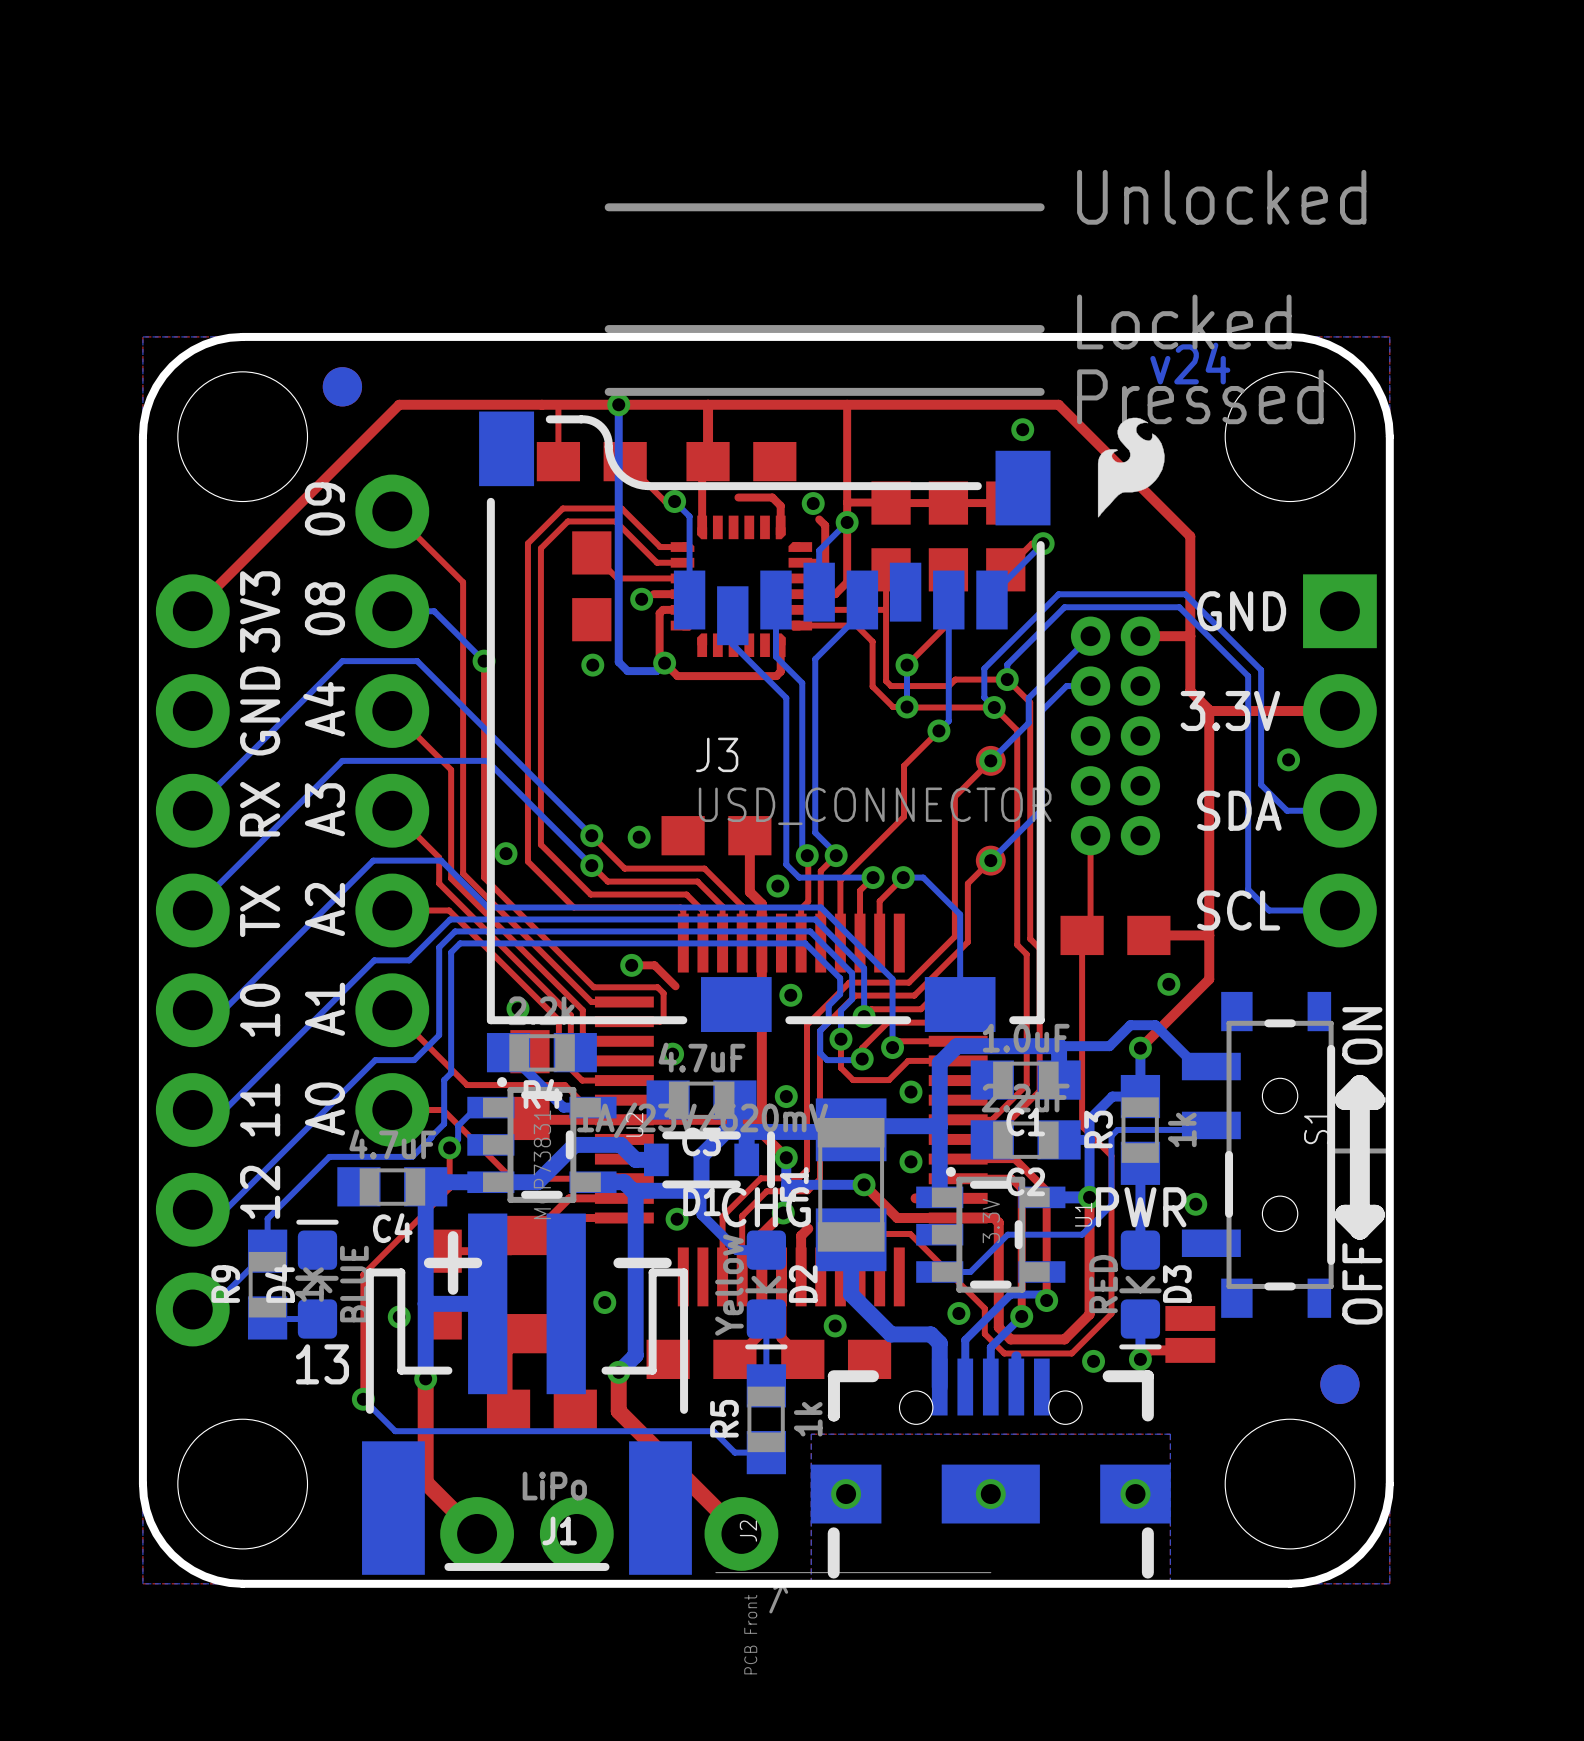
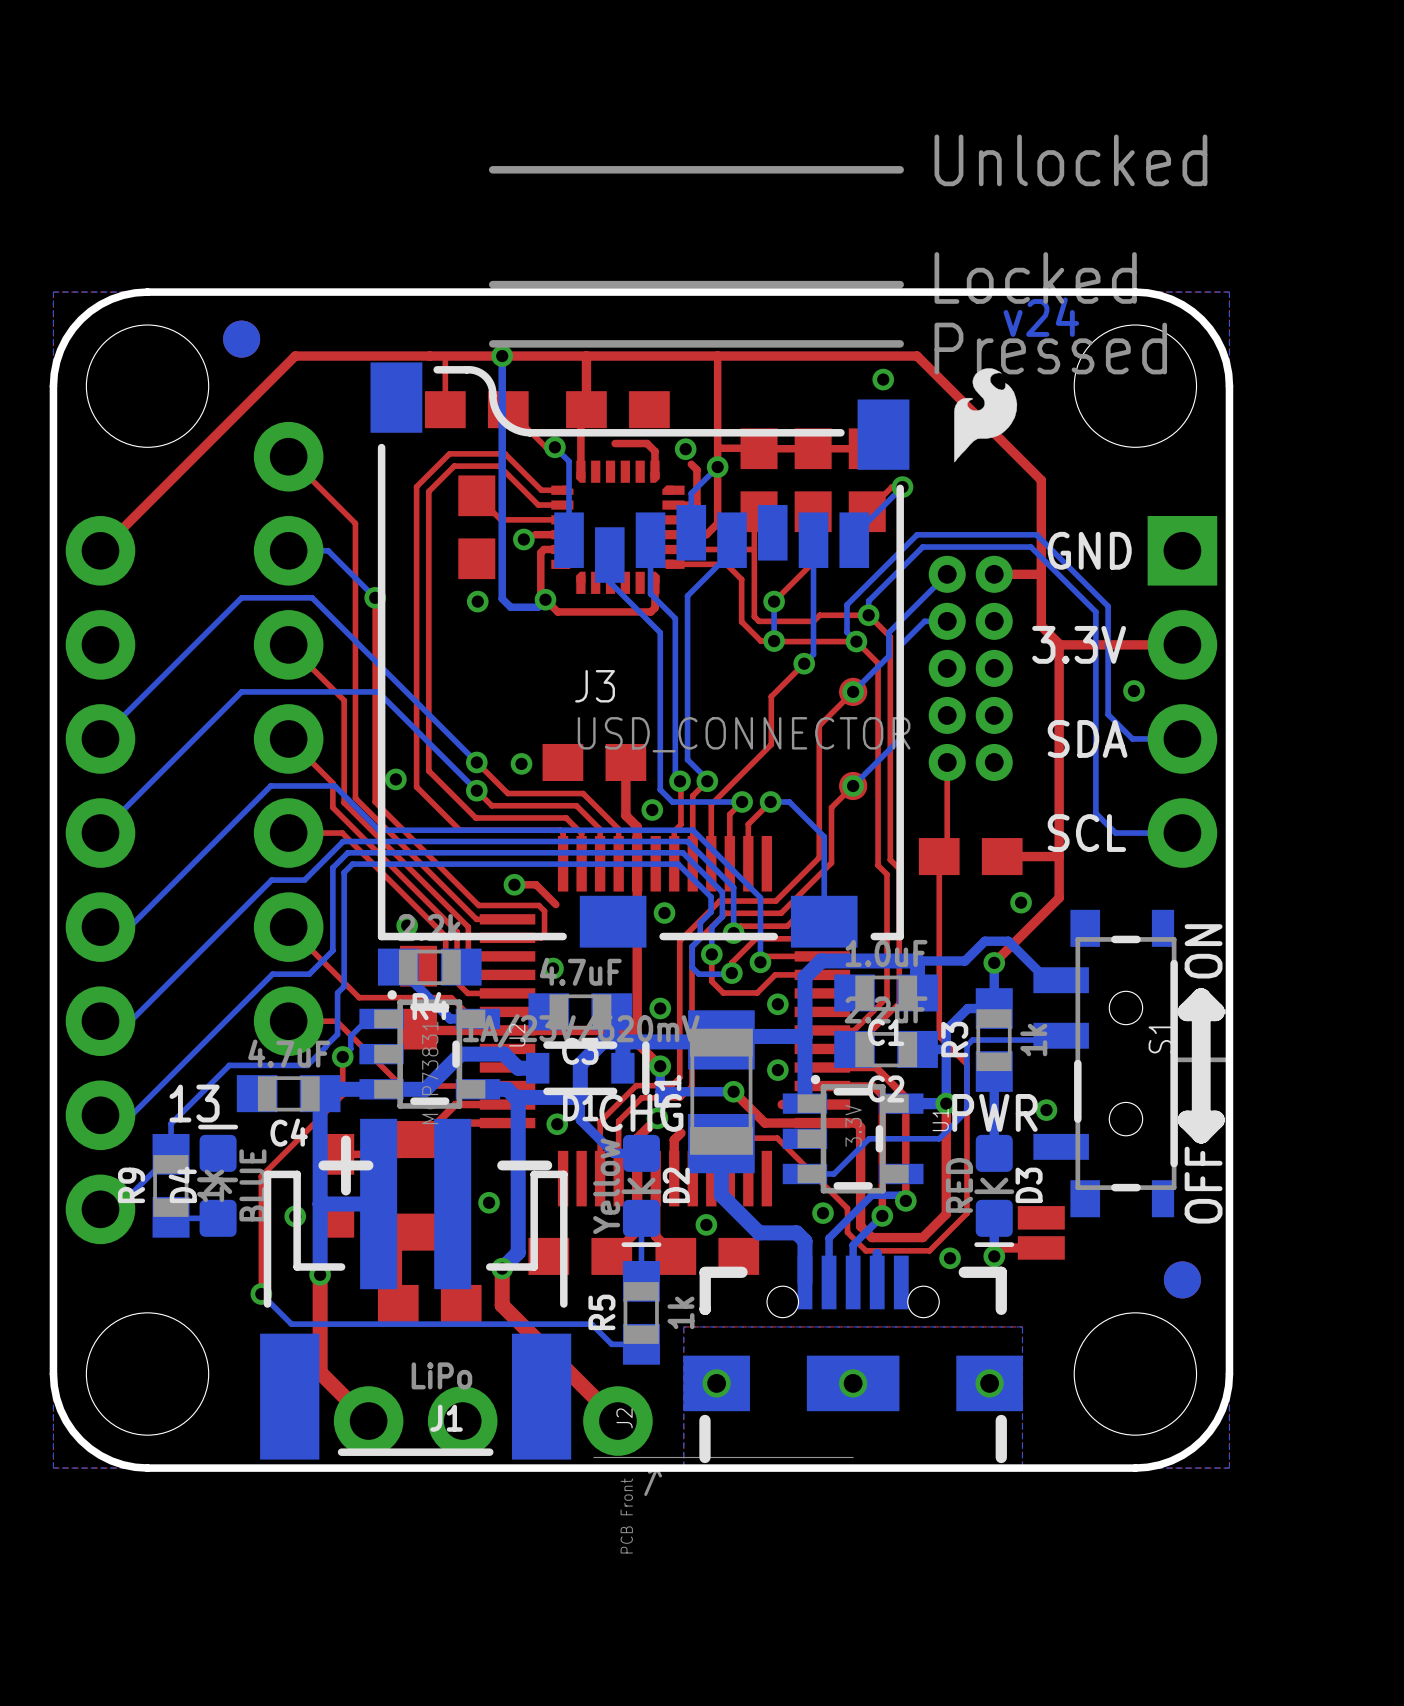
text: 09 (324, 509) -> none
text: 08 (324, 608) -> none
text: 3V3 (260, 611) -> none
text: A4 (324, 709) -> none
text: GND (260, 711) -> none
text: RX (260, 809) -> none
text: A3 (324, 809) -> none
text: A2 (324, 909) -> none
text: TX (260, 911) -> none
text: A1 (324, 1009) -> none
text: 10 (260, 1010) -> none
text: A0 (324, 1109) -> none
text: 11 (260, 1110) -> none
text: 12 (260, 1192) -> none
text position: 13 (322, 1364) -> 13 (194, 1103)

